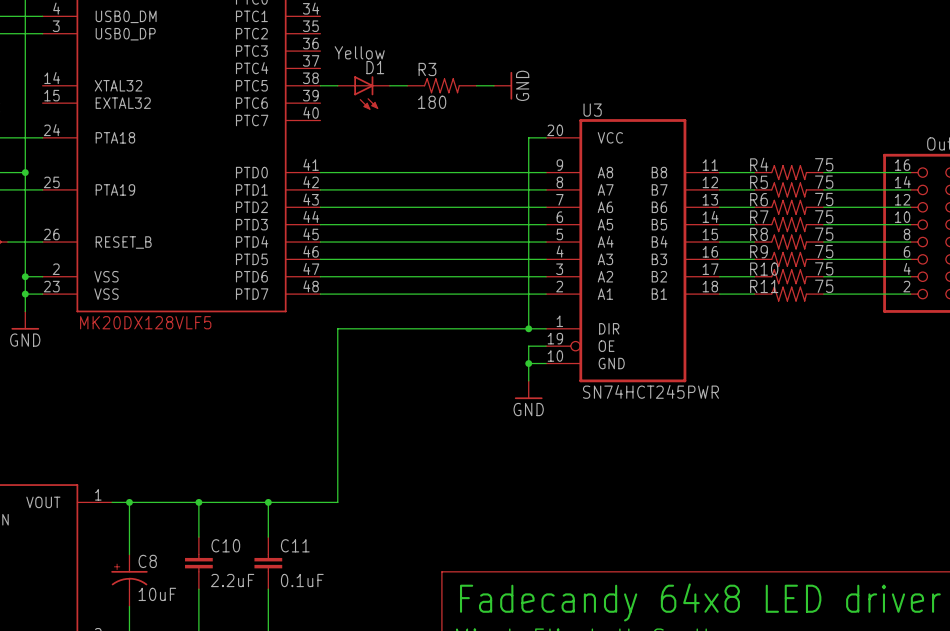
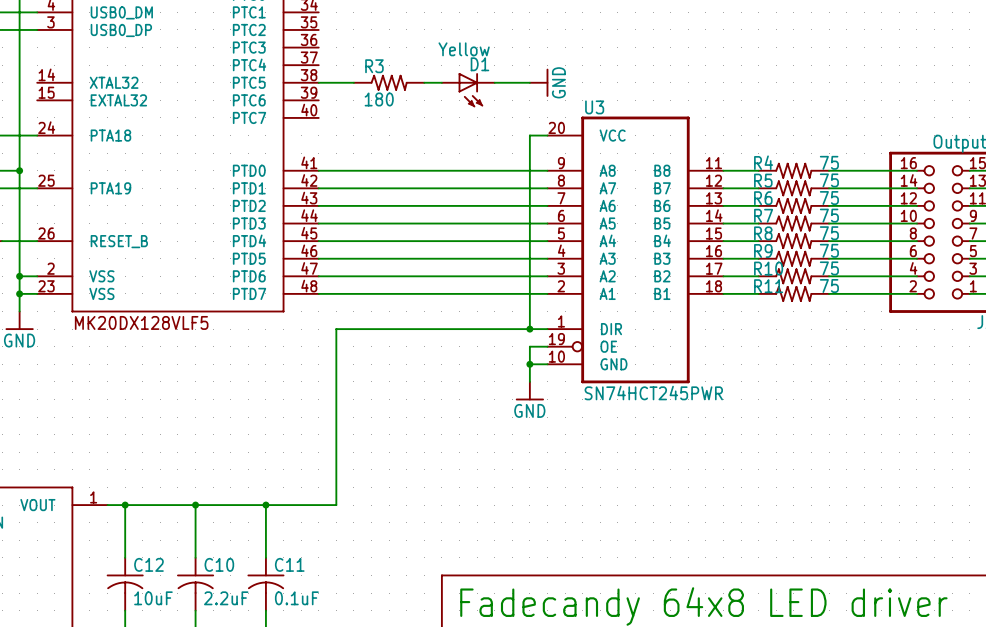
R3 symbol: [407, 78, 477, 94] -> [353, 75, 425, 91]
wire: (389, 85) (407, 85) -> (424, 82) (441, 82)
power symbol position: GND (503, 85) -> GND (539, 82)
D1 position: (363, 92) -> (468, 90)
C10 symbol: [185, 537, 213, 590] -> [177, 557, 215, 611]
C11 symbol: [254, 537, 283, 590] -> [247, 557, 285, 611]
C8: 10uF (129, 580) -> none
C12: none -> 10uF (125, 584)

